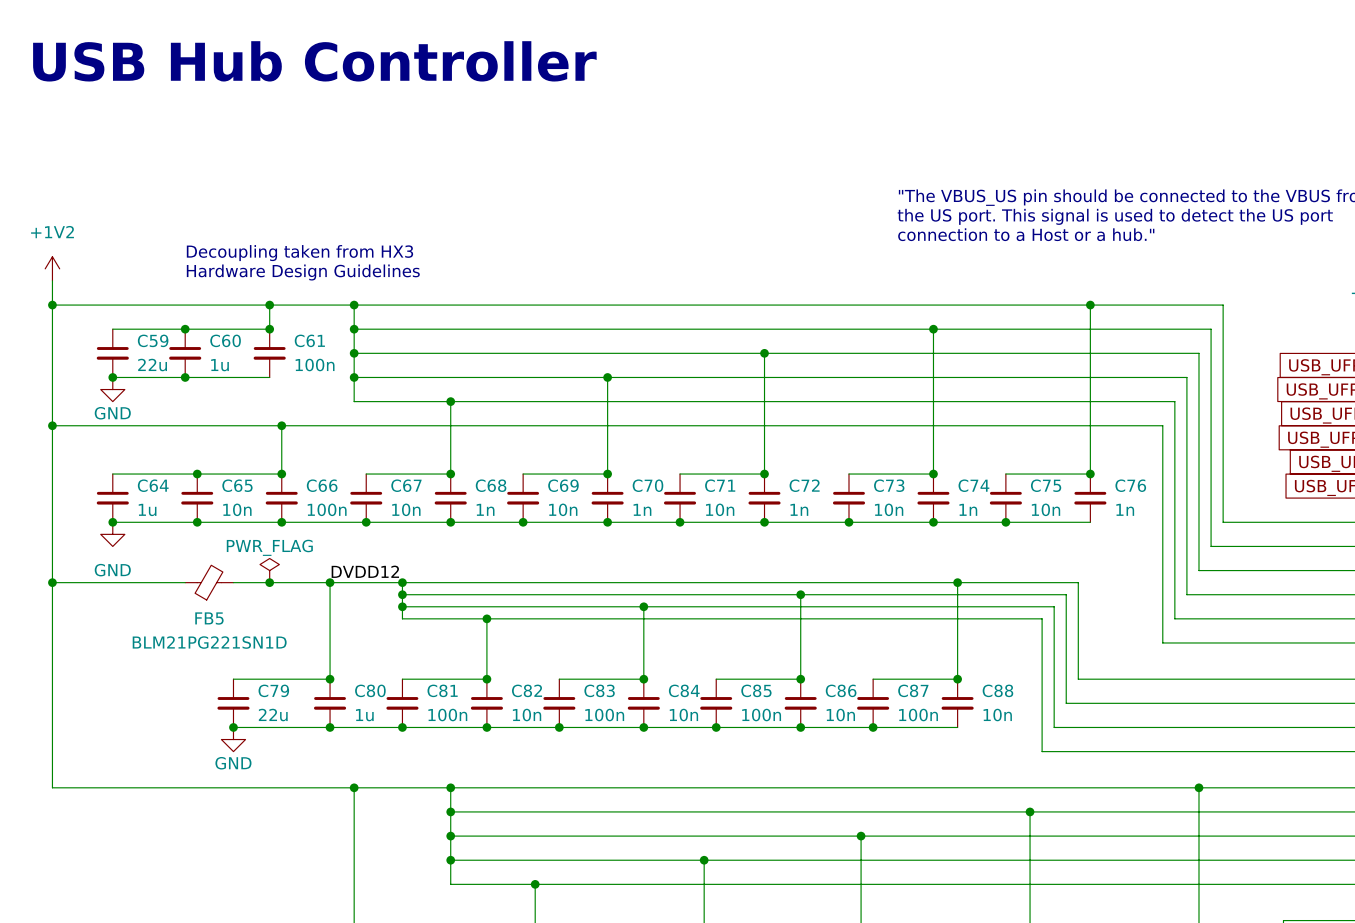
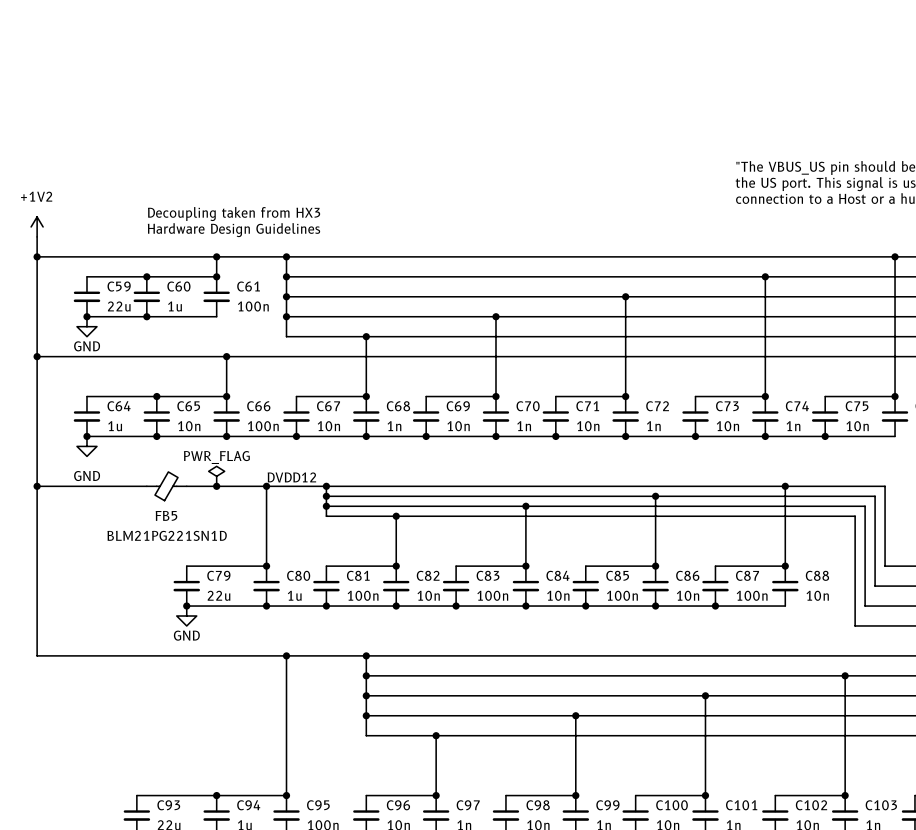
text: USB Hub Controller (314, 61) -> none

